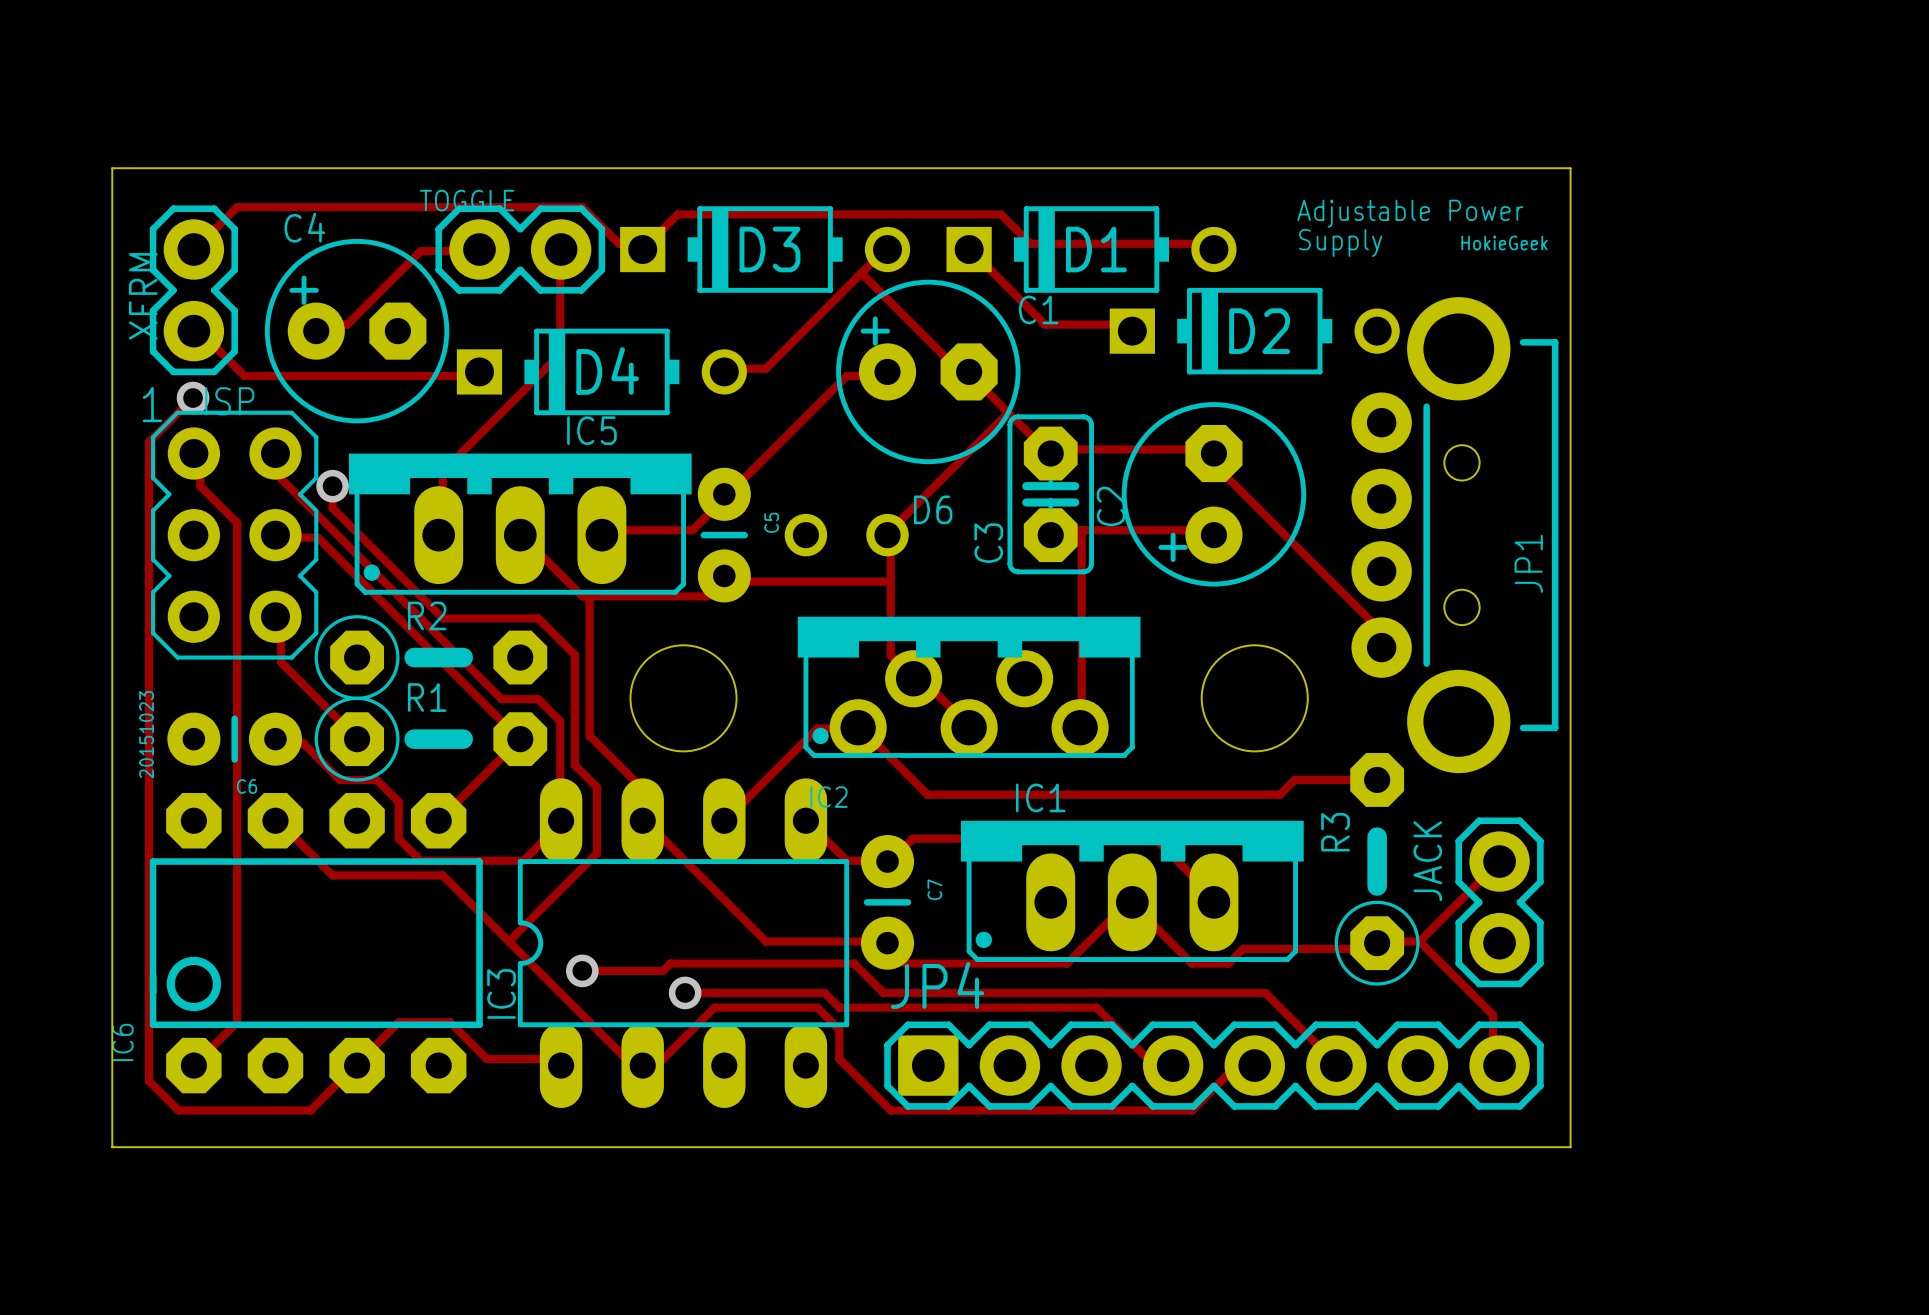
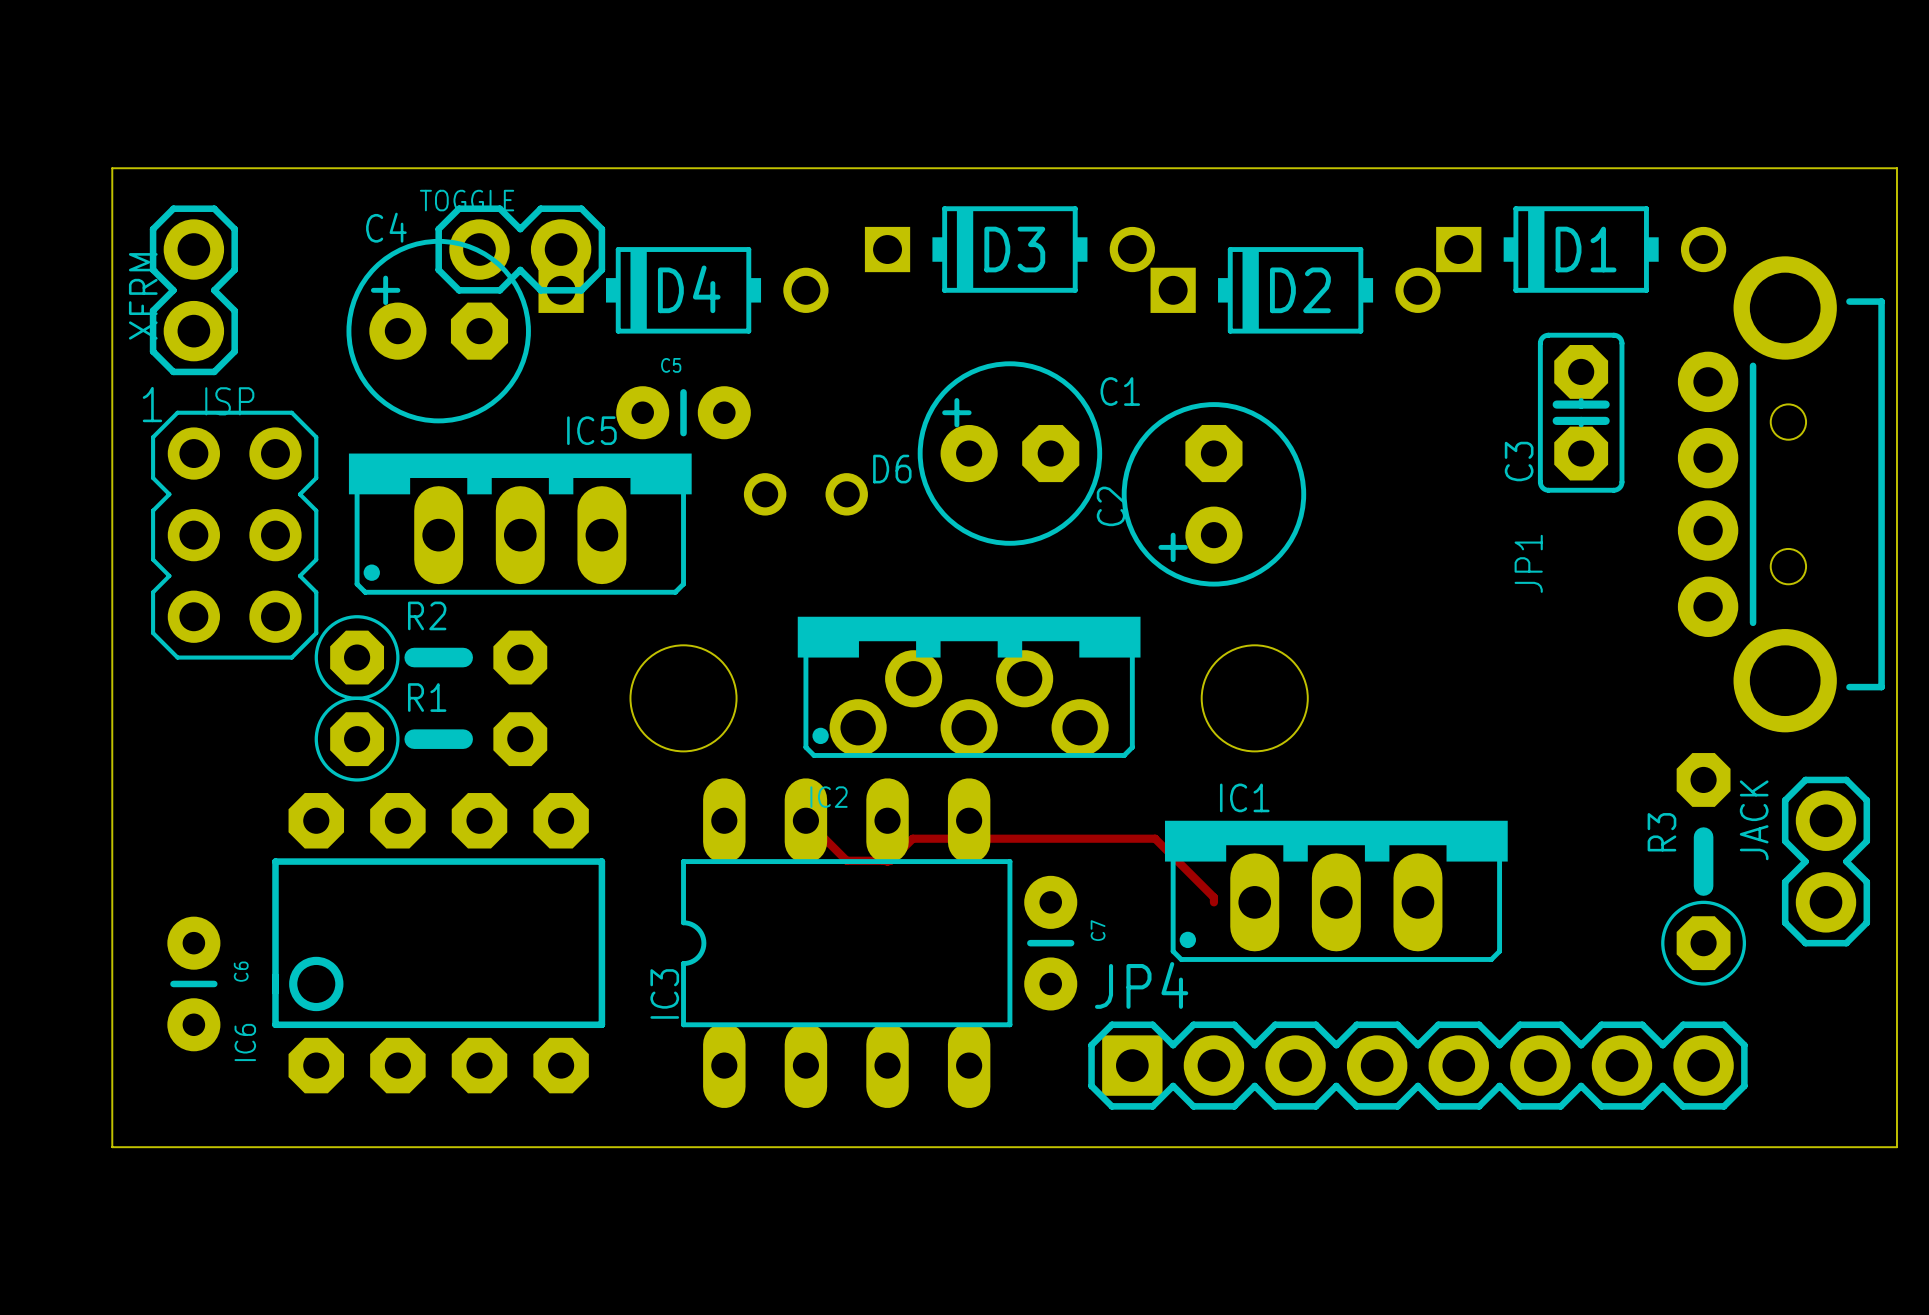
board edge: (1570, 168) (1570, 1147) -> (1570, 168) (1896, 168) (1896, 1147) (1570, 1147)
text: Adjustable Power (1410, 213) -> none
text: Supply (1340, 242) -> none
text: HokieGeek (1504, 242) -> none
track: (193, 249) (237, 207) (582, 207) (619, 243) (641, 243) (642, 249) (677, 214) (1000, 214) (1030, 243) (1213, 243) (1213, 249) -> none
track: (479, 249) (479, 251) (420, 251) (347, 324) (317, 324) (316, 331) -> none
track: (561, 249) (560, 353) (442, 471) (442, 530) (438, 535) -> none
D3 position: (765, 249) -> (1009, 249)
track: (887, 249) (883, 251) (765, 368) (729, 368) (724, 371) -> none
track: (969, 249) (1045, 324) (1125, 324) (1132, 331) -> none
D1 position: (1091, 249) -> (1581, 249)
track: (861, 273) (964, 376) (969, 371) (1050, 453) (1052, 449) (1213, 449) (1213, 464) (1375, 625) (1375, 640) (1381, 647) -> none
track: (193, 331) (200, 331) (244, 376) (479, 376) (479, 371) -> none
C4 position: (357, 331) -> (438, 331)
D2 position: (1254, 331) -> (1295, 290)
D4 position: (601, 371) -> (683, 290)
track: (887, 371) (883, 376) (846, 376) (729, 493) (724, 494) (721, 500) (692, 530) (604, 530) (601, 535) -> none
C1 position: (928, 371) -> (1009, 453)
track: (193, 398) (148, 442) (148, 1081) (178, 1110) (310, 1110) (398, 1022) (450, 1022) (486, 1059) (560, 1059) (561, 1065) -> none
via: (193, 398) -> none
track: (1008, 412) (887, 535) (890, 537) (890, 655) (913, 678) (920, 677) (969, 727) -> none
track: (193, 453) (200, 456) (200, 486) (237, 522) (237, 1022) (193, 1065) -> none
track: (275, 453) (281, 456) (281, 478) (501, 699) (538, 699) (560, 721) (560, 824) (523, 860) (420, 860) (398, 838) (398, 801) (376, 779) (339, 779) (303, 743) (281, 743) (275, 739) -> none
track: (332, 486) (332, 508) (442, 618) (538, 618) (574, 655) (574, 765) (597, 787) (597, 853) (508, 941) -> none
via: (332, 486) -> none
C3 position: (1050, 494) -> (1581, 412)
C5 name position: C5 (771, 522) -> C5 (671, 365)
track: (1081, 530) (1081, 721) (1080, 727) -> none
track: (275, 535) (281, 537) (317, 537) (520, 739) (438, 820) -> none
track: (520, 535) (582, 596) (707, 596) (721, 581) (724, 575) (729, 581) (890, 581) -> none
C5 rotation: 0° (724, 535) -> 90° clockwise (683, 412)
C5 position: (724, 535) -> (683, 412)
D6 position: (846, 535) -> (805, 494)
track: (1050, 535) (1052, 530) (1213, 530) (1213, 535) -> none
JP1 position: (1454, 535) -> (1781, 494)
track: (589, 596) (589, 735) (641, 787) (642, 820) (648, 824) (765, 941) (883, 941) (887, 943) (905, 963) (1067, 963) (1125, 904) (1132, 902) (1191, 963) (1228, 963) (1243, 948) (1375, 948) (1377, 943) (1382, 941) (1419, 941) -> none
track: (275, 616) (281, 618) (281, 662) (357, 739) -> none
text: 20151023 (146, 734) -> none
C6 rotation: 0° (234, 739) -> 90° clockwise (193, 983)
C6 position: (234, 739) -> (193, 983)
track: (1377, 779) (1294, 779) (1280, 794) (927, 794) (861, 728) (817, 728) (724, 820) -> none
C6 name position: C6 (247, 786) -> C6 (241, 971)
track: (275, 820) (281, 824) (332, 875) (442, 875) (626, 1059) (641, 1059) (642, 1065) (648, 1059) (663, 1059) (714, 1007) (817, 1007) (839, 1029) (839, 1059) (890, 1110) (1191, 1110) (1235, 1066) (1254, 1065) -> none
track: (1499, 861) (1419, 941) -> none
R3 position: (1377, 869) -> (1703, 869)
IC1 position: (1132, 891) -> (1336, 891)
C7 position: (887, 902) -> (1050, 943)
JACK position: (1499, 902) -> (1825, 861)
track: (1419, 941) (1493, 1014) (1493, 1059) (1499, 1065) -> none
IC6 position: (316, 943) -> (438, 943)
IC3 position: (683, 943) -> (846, 943)
track: (582, 970) (663, 970) (670, 963) (854, 963) (883, 992) (1265, 992) (1336, 1065) -> none
via: (582, 970) -> none
track: (685, 992) (824, 992) (839, 1007) (1096, 1007) (1147, 1059) (1169, 1059) (1173, 1065) -> none
via: (685, 992) -> none
JP4 position: (1213, 1065) -> (1417, 1065)

